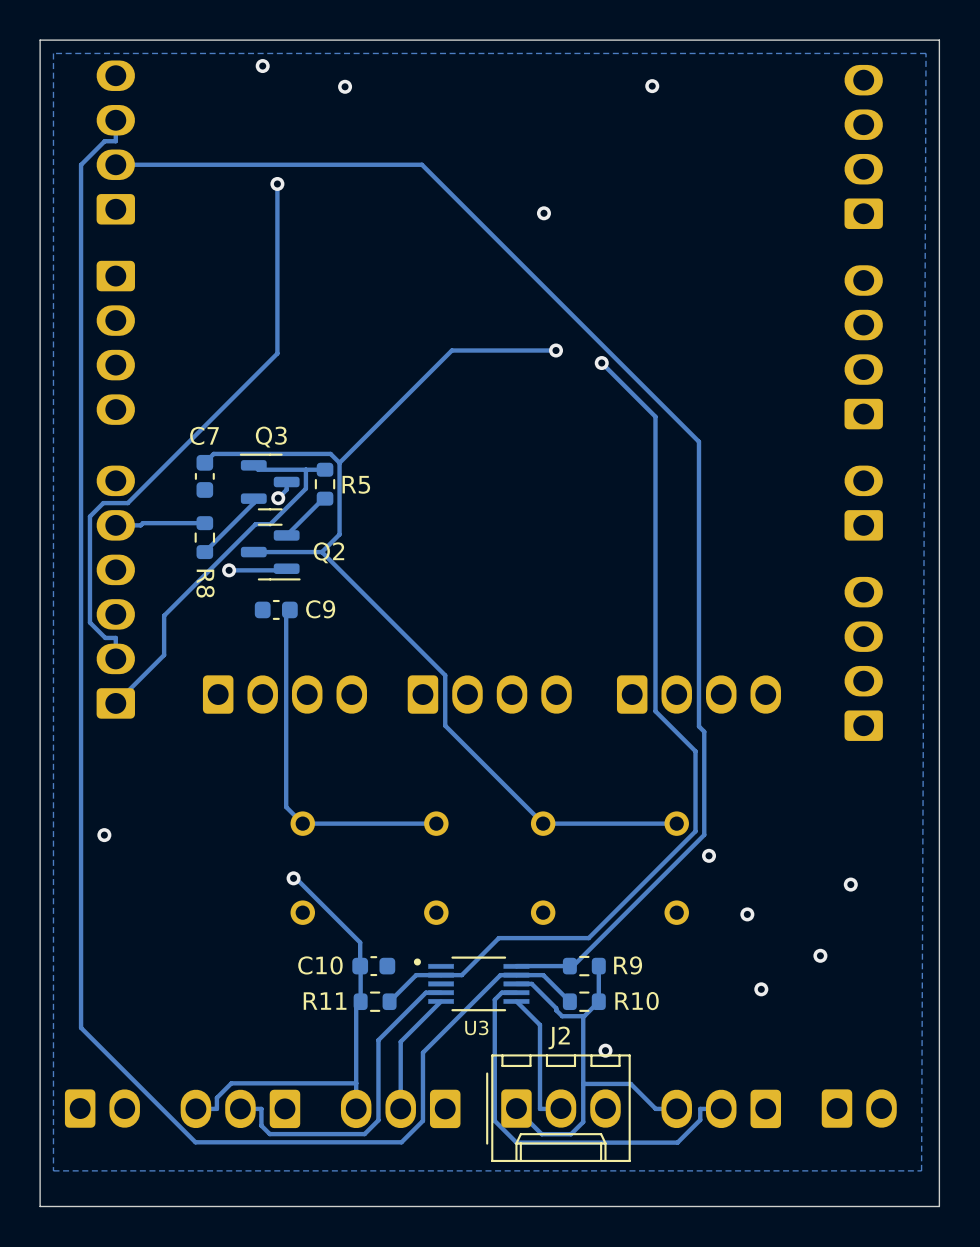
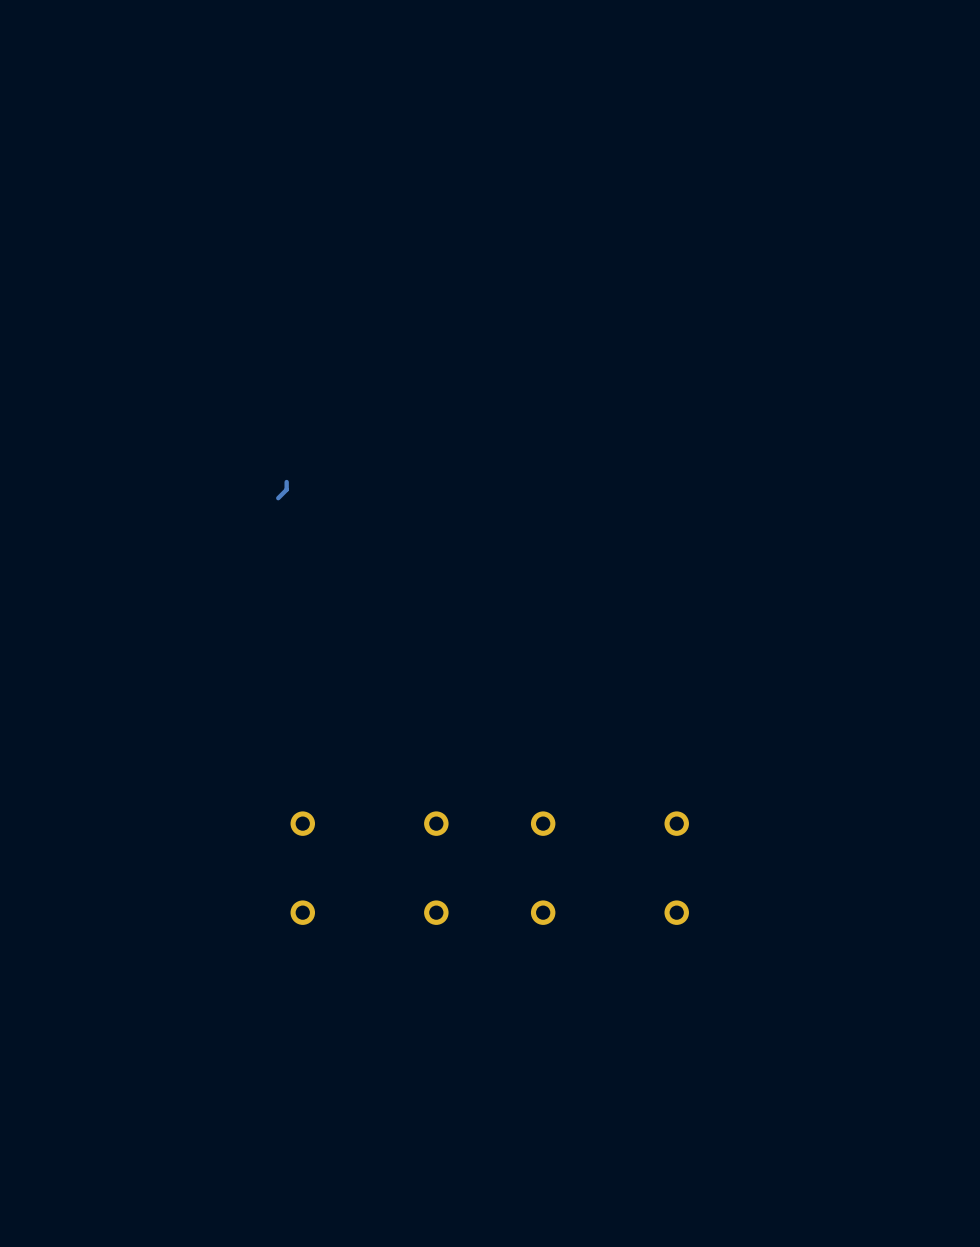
board edge: (939, 40) (40, 40) (40, 1206) (939, 1206) (939, 40) -> none
zone outline: (926, 53) (53, 53) (53, 1170) (921, 1170) (926, 53) -> none
via: (262, 66) -> none
via: (345, 86) -> none
via: (652, 86) -> none
track: (115, 120) (115, 141) (104, 141) (81, 164) (81, 1027) (195, 1142) (401, 1142) (422, 1120) (422, 1052) (500, 975) (543, 975) (569, 1001) -> none
part: (115, 142) -> none
part: (863, 146) -> none
track: (115, 164) (421, 164) (698, 441) (698, 726) (704, 731) (704, 834) (573, 966) (516, 966) -> none
track: (277, 183) (277, 353) (127, 503) (103, 503) (89, 516) (89, 622) (105, 637) (115, 637) (115, 658) -> none
via: (277, 183) -> none
via: (543, 213) -> none
part: (115, 342) -> none
part: (863, 347) -> none
track: (556, 350) (451, 350) (339, 462) -> none
via: (556, 350) -> none
track: (601, 363) (655, 416) (655, 711) (695, 751) (695, 831) (588, 938) (498, 938) (461, 975) (416, 975) (389, 1001) -> none
via: (601, 363) -> none
track: (339, 462) (339, 534) (321, 552) -> none
track: (339, 462) (330, 453) (213, 453) (204, 462) -> none
track: (253, 465) (258, 469) (325, 469) -> none
track: (305, 469) (305, 488) (270, 524) (255, 524) (164, 615) (164, 655) (115, 703) -> none
C7: (204, 476) -> none
Q3: (269, 482) -> none
R5: (325, 484) -> none
track: (253, 498) (253, 503) (204, 552) -> none
via: (278, 498) -> none
track: (325, 498) (286, 535) -> none
part: (863, 503) -> none
track: (204, 523) (142, 523) (140, 525) (115, 525) -> none
R8: (204, 537) -> none
Q2: (270, 552) -> none
track: (321, 552) (445, 675) (445, 725) (543, 823) (676, 823) -> none
track: (321, 552) (253, 552) -> none
track: (286, 568) (285, 570) (229, 570) -> none
via: (229, 570) -> none
part: (115, 592) -> none
C9: (276, 609) -> none
track: (289, 609) (286, 613) (286, 807) (302, 823) (436, 823) -> none
part: (863, 658) -> none
part: (284, 694) -> none
part: (489, 694) -> none
part: (698, 694) -> none
via: (104, 835) -> none
via: (709, 855) -> none
track: (293, 878) (295, 878) (360, 942) (360, 1001) (356, 1006) (356, 1108) -> none
via: (293, 878) -> none
via: (850, 884) -> none
via: (747, 914) -> none
via: (820, 955) -> none
C10: (373, 966) -> none
R9: (584, 966) -> none
track: (598, 966) (598, 1001) (584, 1016) (562, 1016) (531, 983) (516, 983) -> none
U3: (471, 983) -> none
via: (761, 989) -> none
track: (441, 992) (425, 992) (378, 1040) (378, 1120) (364, 1134) (269, 1134) (261, 1125) (261, 1108) (240, 1108) -> none
track: (516, 992) (501, 992) (494, 999) (494, 1120) (516, 1142) (677, 1142) (700, 1119) (700, 1108) (721, 1108) -> none
R11: (375, 1001) -> none
track: (441, 1001) (400, 1041) (400, 1108) -> none
track: (516, 1001) (540, 1024) (540, 1108) (560, 1108) -> none
R10: (584, 1001) -> none
track: (583, 1016) (583, 1122) (571, 1134) (541, 1134) (516, 1108) -> none
via: (605, 1050) -> none
track: (356, 1083) (231, 1083) (216, 1097) (216, 1108) (195, 1108) -> none
track: (583, 1083) (630, 1083) (655, 1108) (676, 1108) -> none
part: (102, 1108) -> none
part: (240, 1108) -> none
part: (400, 1108) -> none
J2: (558, 1108) -> none
part: (721, 1108) -> none
part: (859, 1108) -> none

